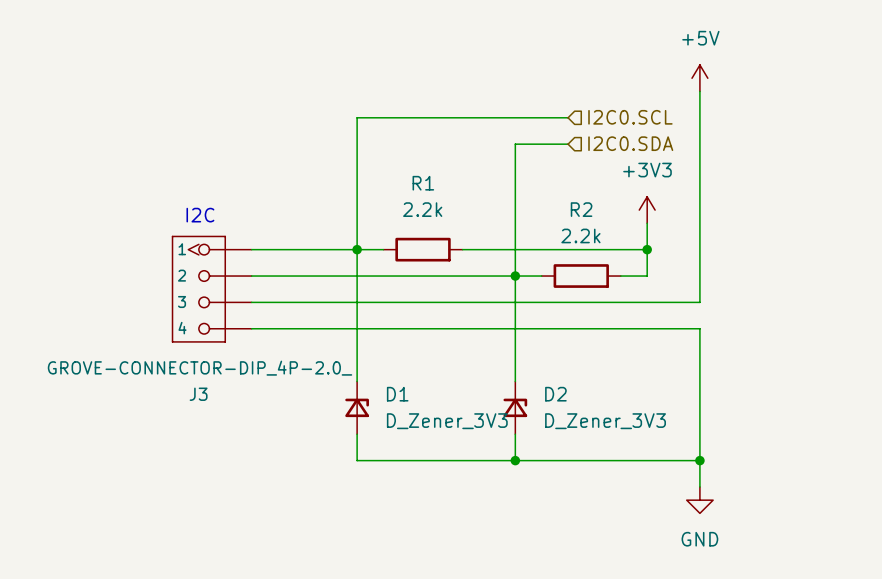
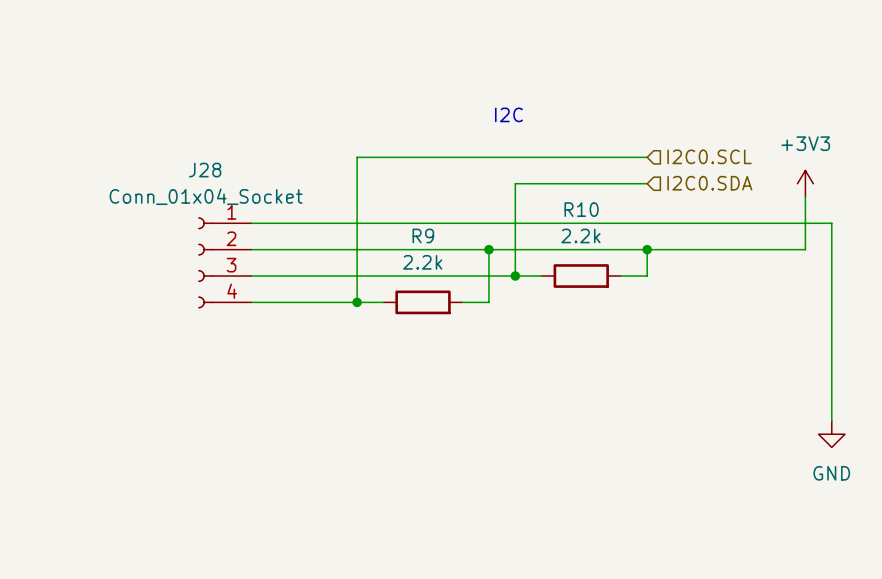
power symbol: +5V (699, 78) -> none
wire: (699, 91) (699, 302) (488, 302) -> (488, 249) (488, 302)
text: none -> I2C (508, 114)
wire: (568, 117) (357, 117) (357, 157) -> (647, 157) (357, 157)
hierarchical label position: I2C0.SCL (630, 117) -> I2C0.SCL (709, 156)
hierarchical label position: I2C0.SDA (630, 143) -> I2C0.SDA (709, 183)
wire: (568, 144) (515, 144) (515, 183) -> (647, 183) (515, 183)
R2 name: R2 (581, 209) -> R10 (581, 209)
power symbol position: +3V3 (647, 210) -> +3V3 (805, 183)
text: I2C (200, 215) -> none
wire: none -> (251, 223) (831, 223) (831, 421)
wire: (647, 223) (647, 249) -> (805, 196) (805, 249) (647, 249)
junction position: (357, 249) -> (357, 302)
R1: 2.2k (423, 249) -> none
junction: none -> (488, 249)
J28: none -> Conn_01x04_Socket (224, 262)
wire: (515, 276) (515, 381) -> none
J3: GROVE-CONNECTOR-DIP_4P-2.0_ (212, 289) -> none
wire: (357, 302) (357, 381) -> none
wire: (383, 302) (462, 302) -> (383, 249) (462, 249)
R9: none -> 2.2k (423, 302)
wire: (251, 328) (699, 328) (699, 486) -> none
D1: D_Zener_3V3 (357, 407) -> none
D2: D_Zener_3V3 (515, 407) -> none
wire: (357, 434) (357, 460) (699, 460) -> none
wire: (515, 434) (515, 460) -> none
junction: (515, 460) -> none
junction: (699, 460) -> none
power symbol position: GND (699, 500) -> GND (831, 434)

